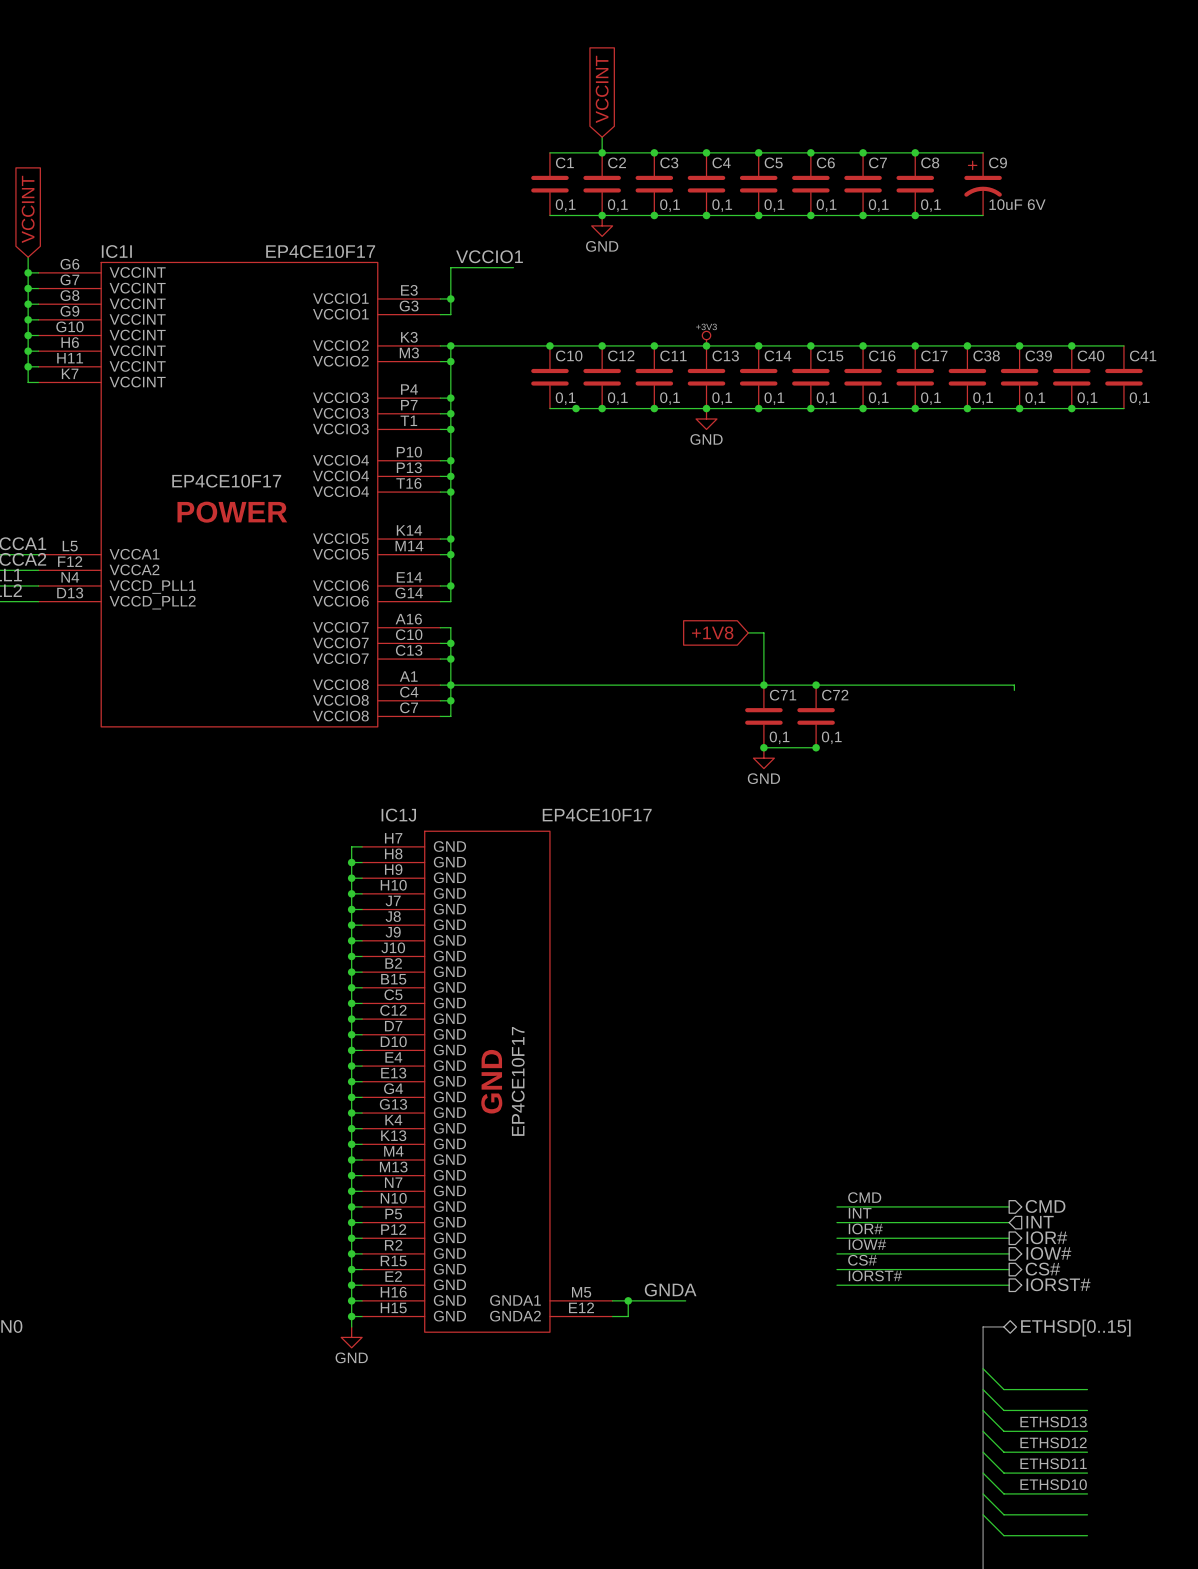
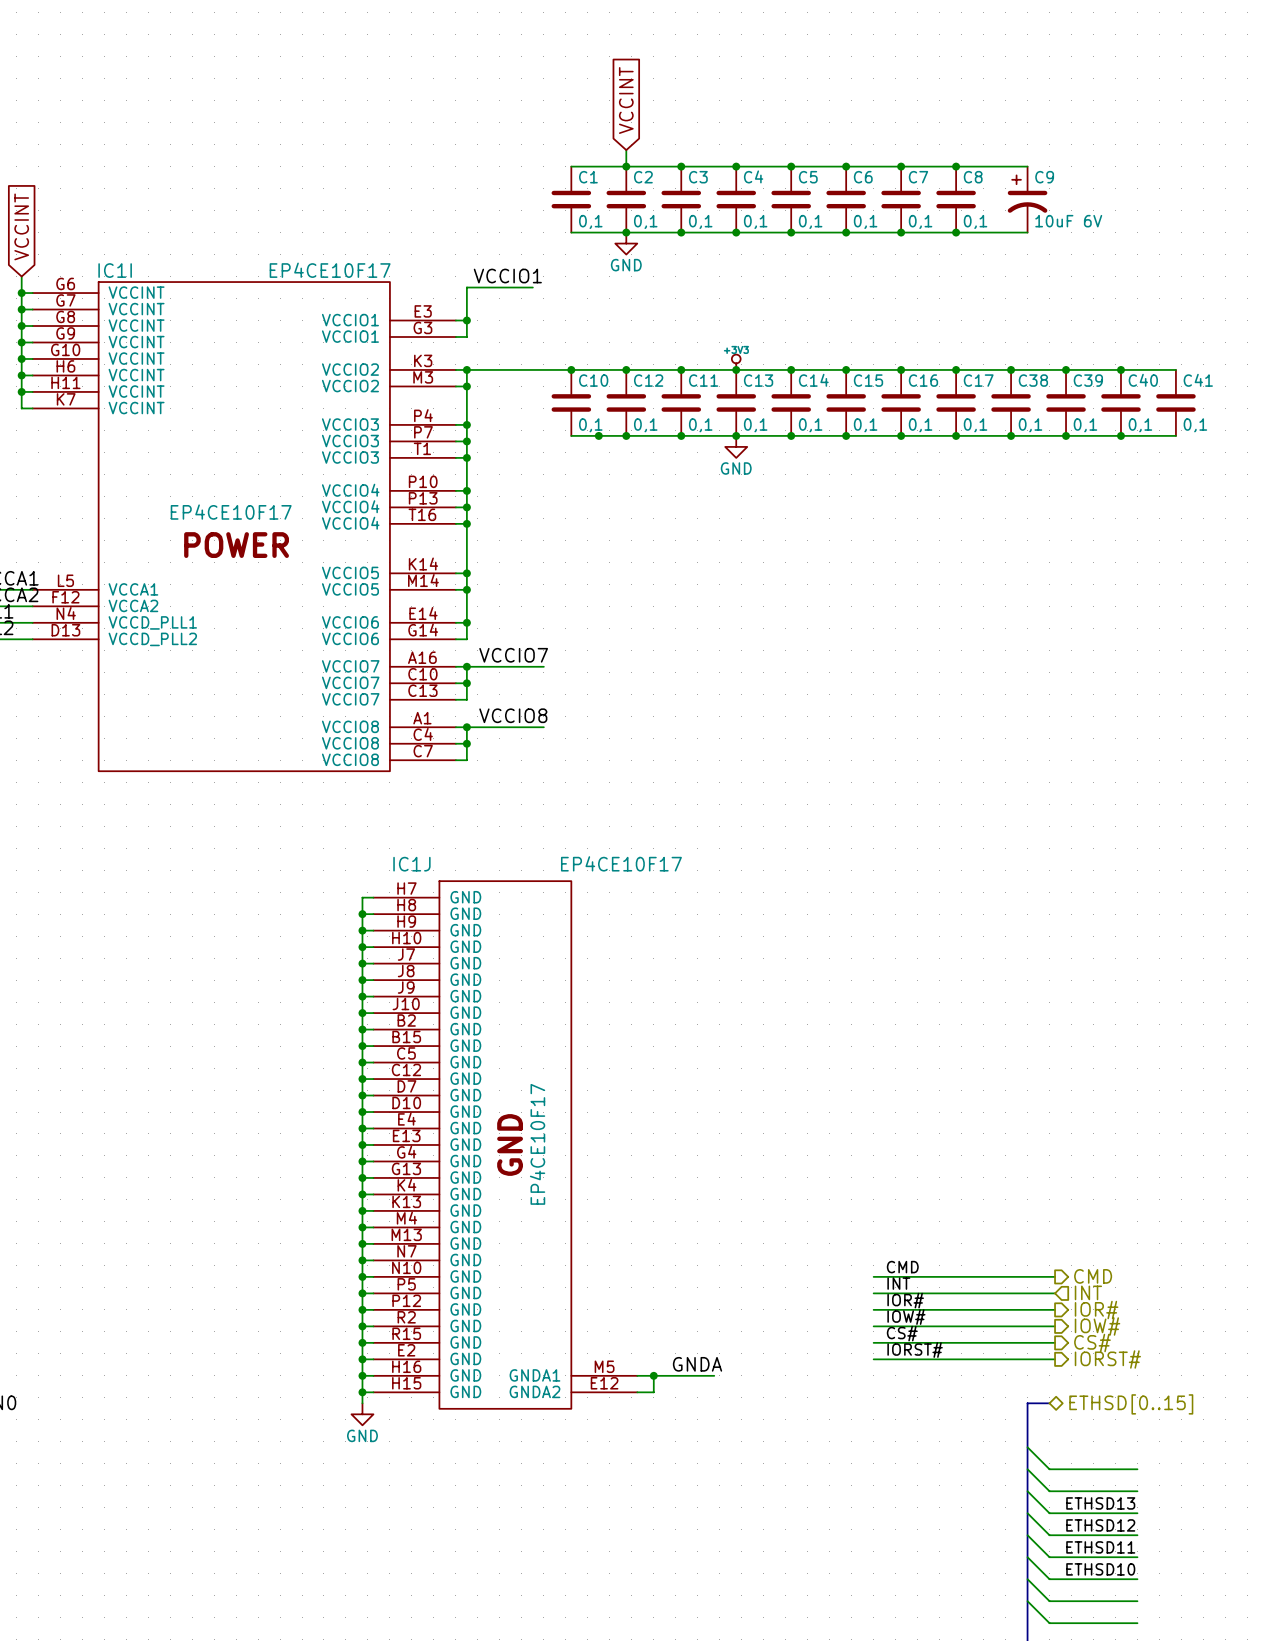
label: none -> VCCIO7 (513, 655)
wire: none -> (466, 666) (543, 666)
global label: +1V8 (712, 632) -> none
wire: (748, 632) (763, 632) (763, 685) -> none
wire: (450, 659) (450, 685) -> none
junction position: (450, 659) -> (466, 666)
label: none -> VCCIO8 (513, 715)
wire: (523, 685) (1014, 685) (1014, 690) -> none
junction: (763, 685) -> none
junction: (816, 685) -> none
C71: 0,1 (763, 716) -> none
C72: 0,1 (816, 716) -> none
wire: (763, 747) (816, 747) -> none
junction: (763, 747) -> none
junction: (816, 747) -> none
power symbol: GND (763, 758) -> none

